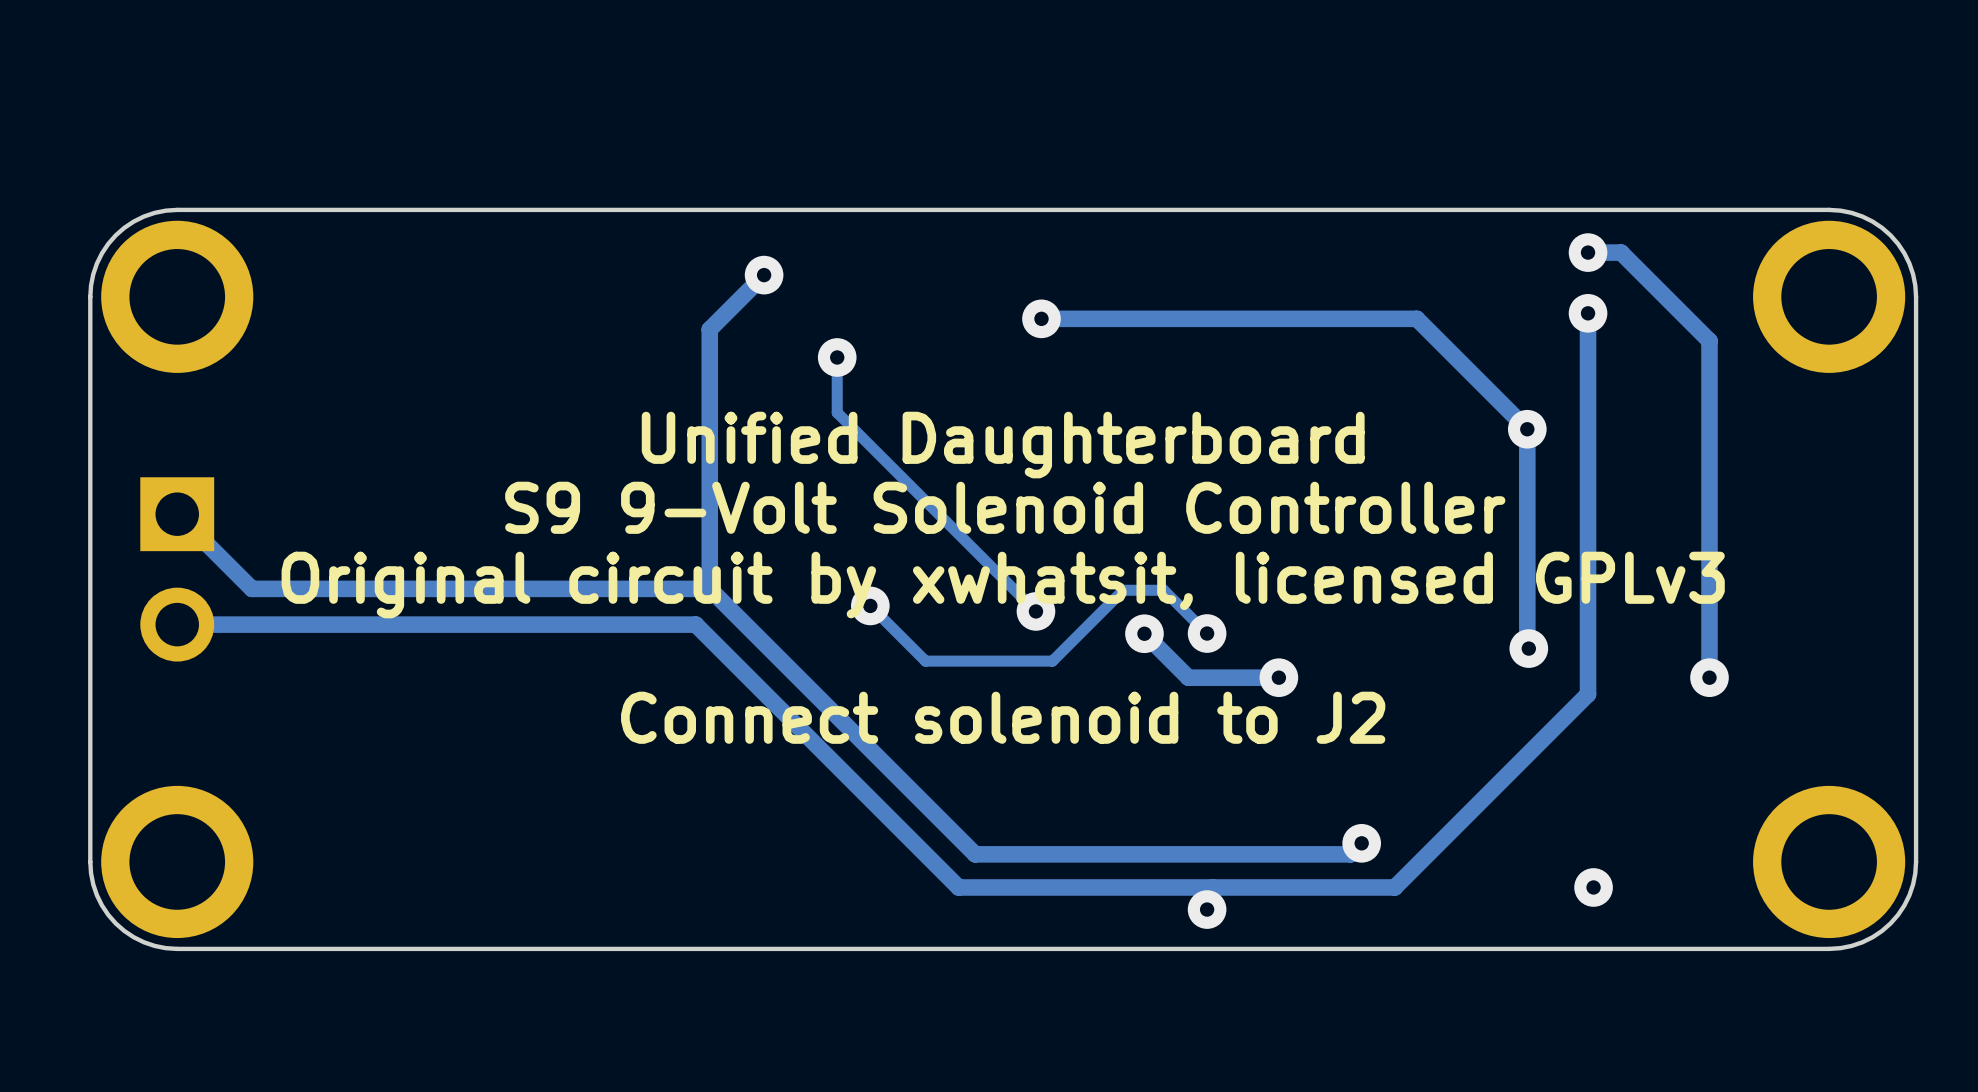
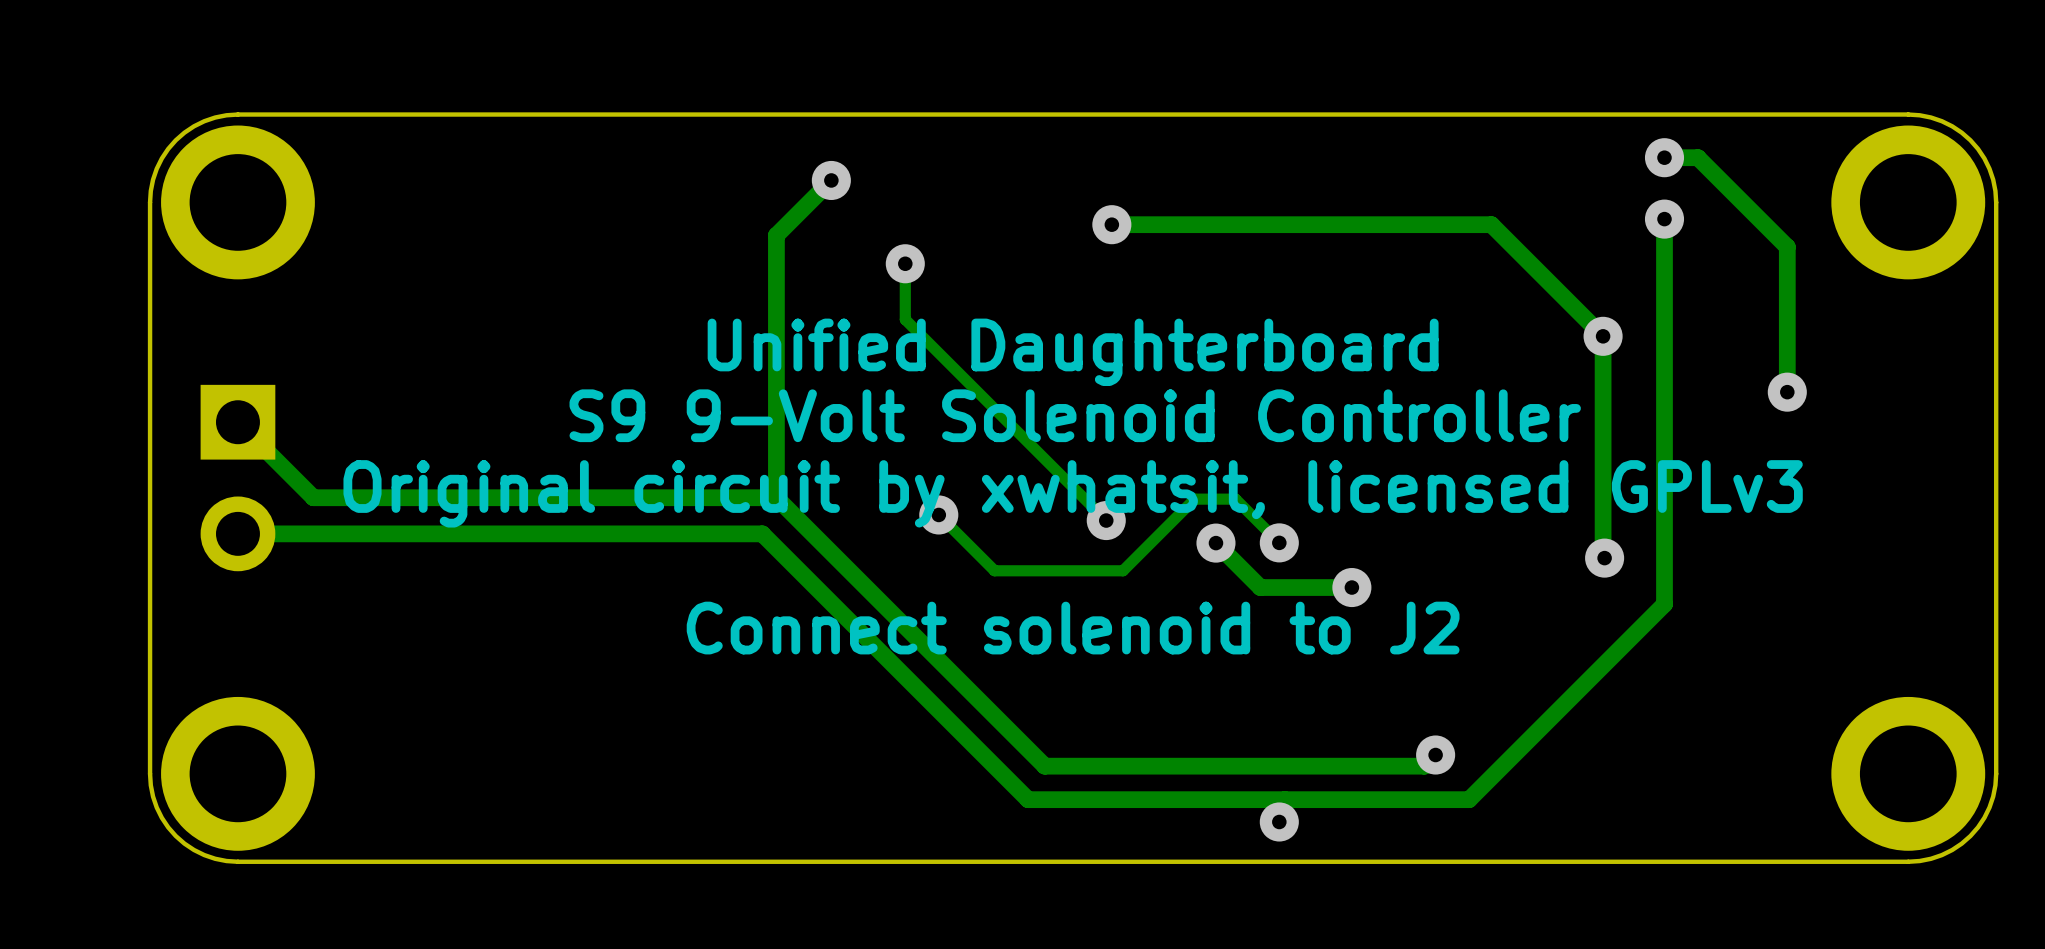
track: (1709, 484) (1709, 677) -> none
via position: (1709, 677) -> (1787, 392)
via: (1593, 887) -> none

